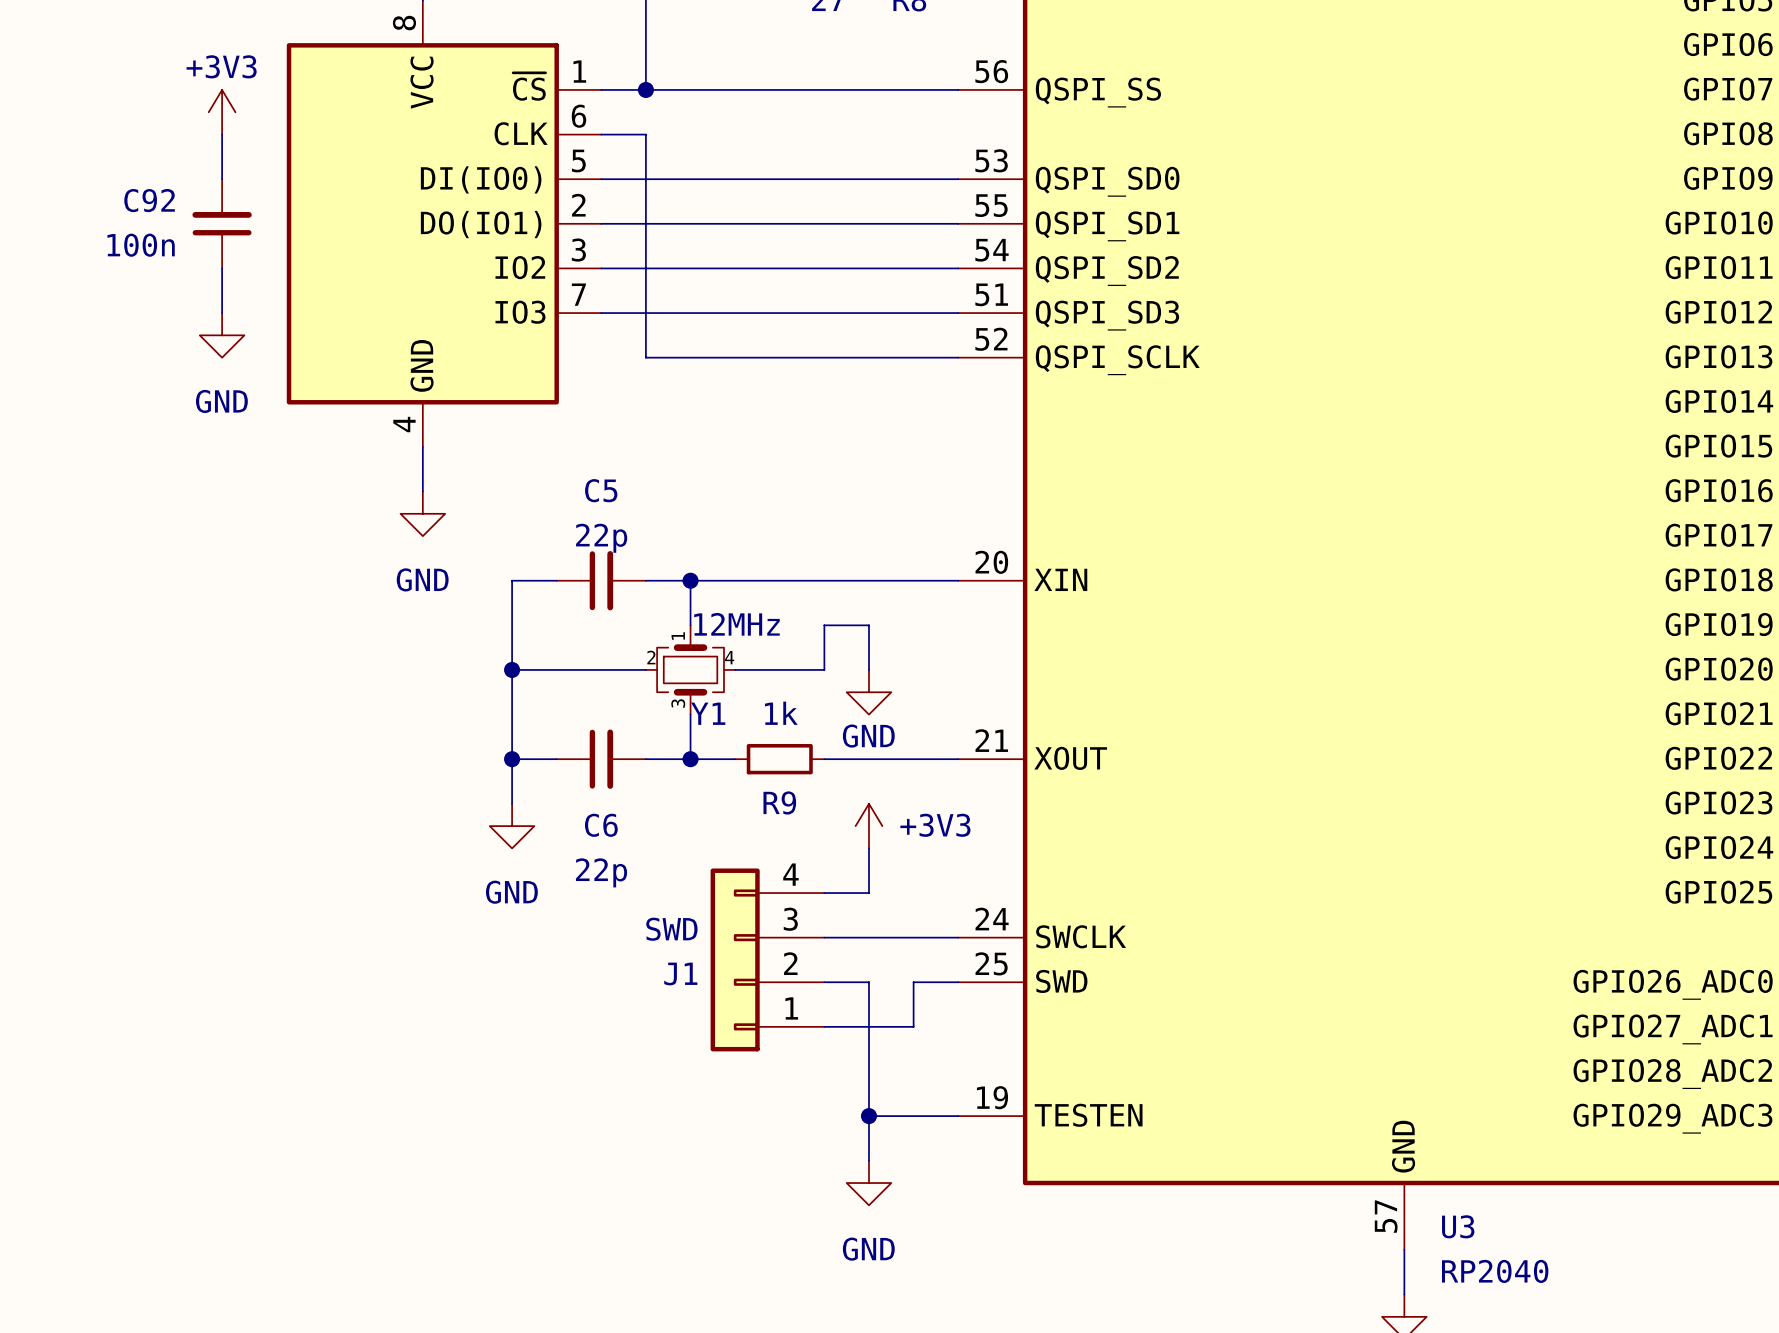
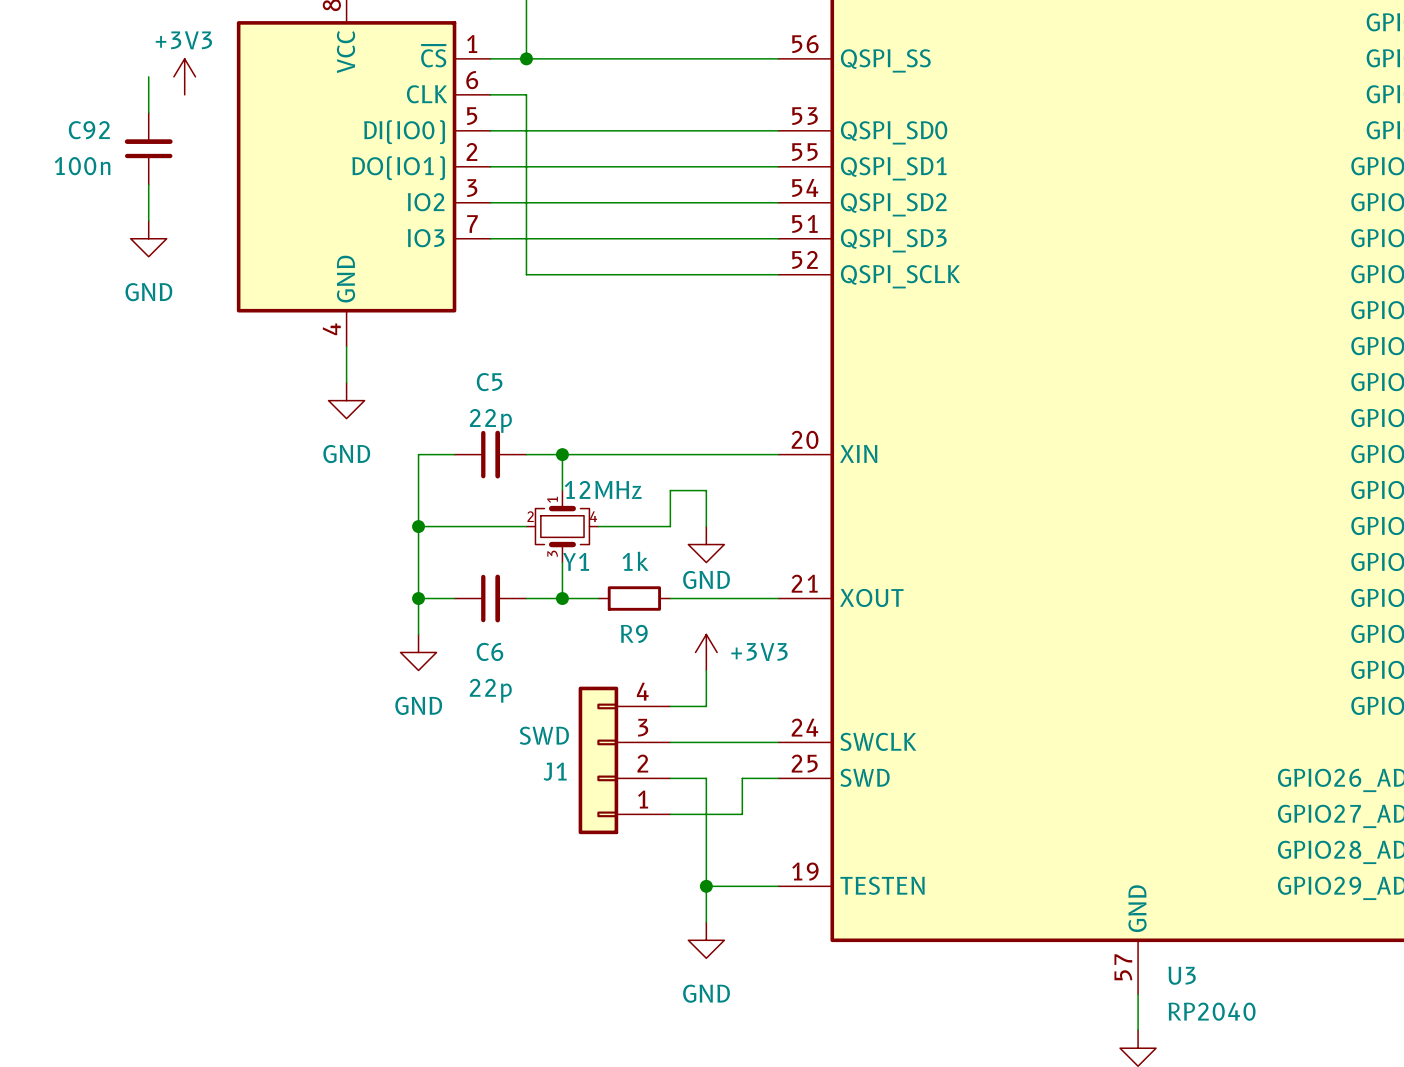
wire: (222, 134) (222, 179) -> (148, 76) (148, 112)
C92 position: (222, 223) -> (148, 148)
wire: (222, 268) (222, 313) -> (148, 184) (148, 220)
power symbol position: GND (222, 335) -> GND (148, 238)

